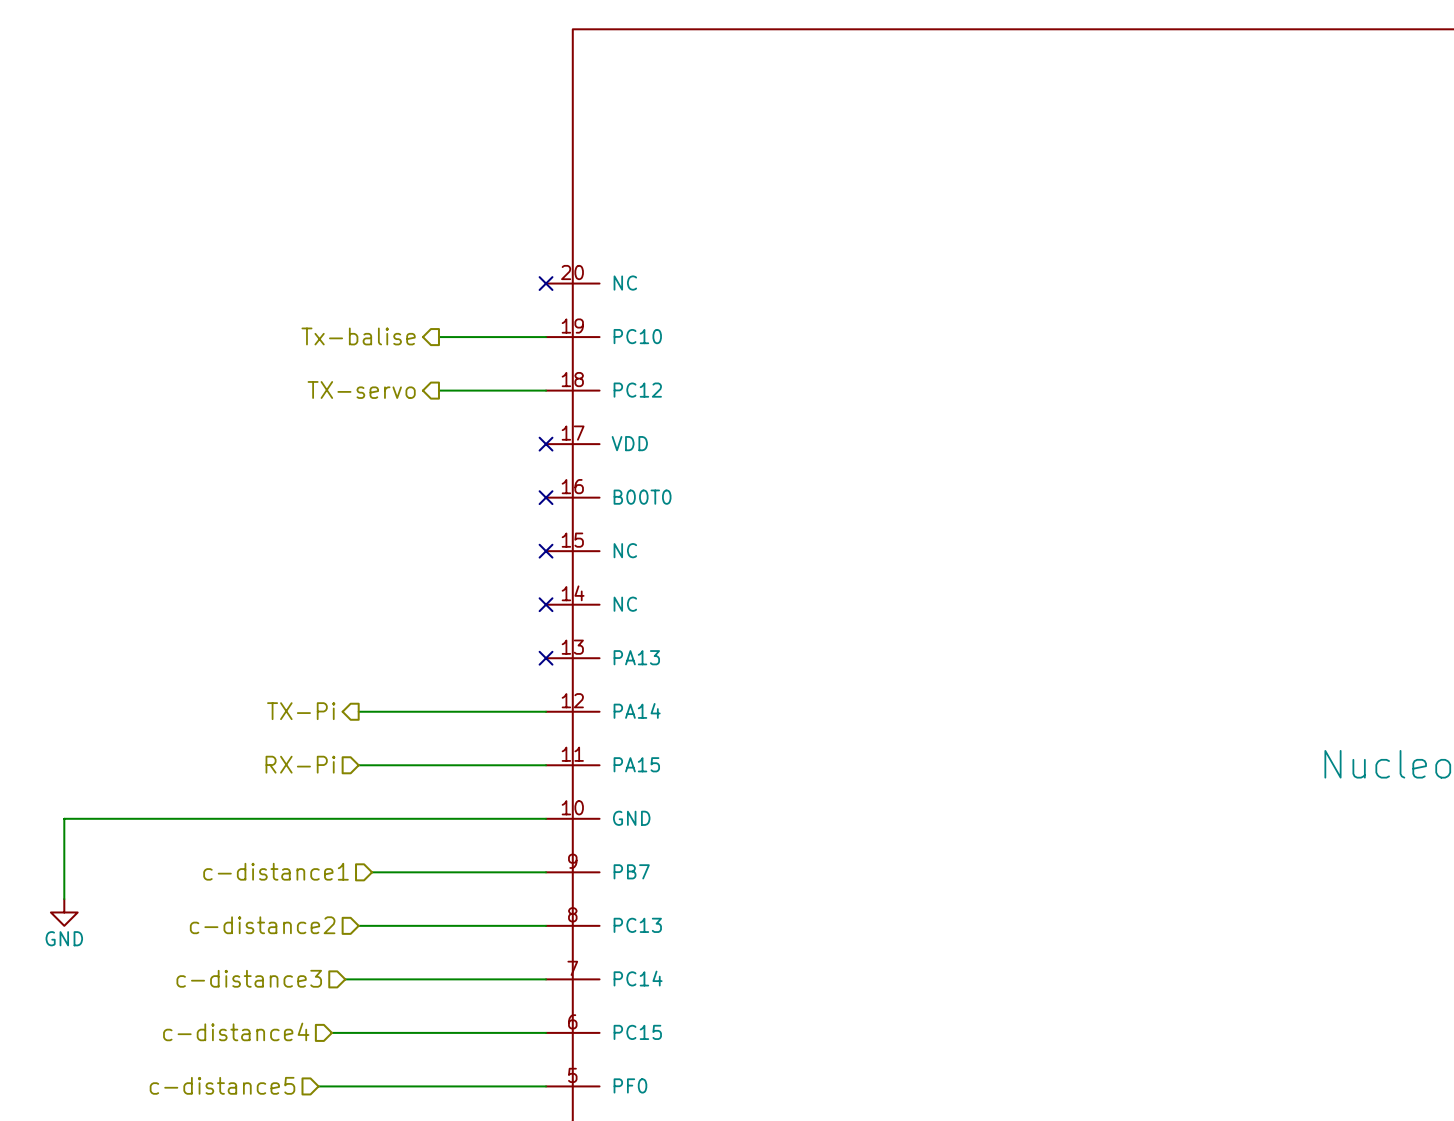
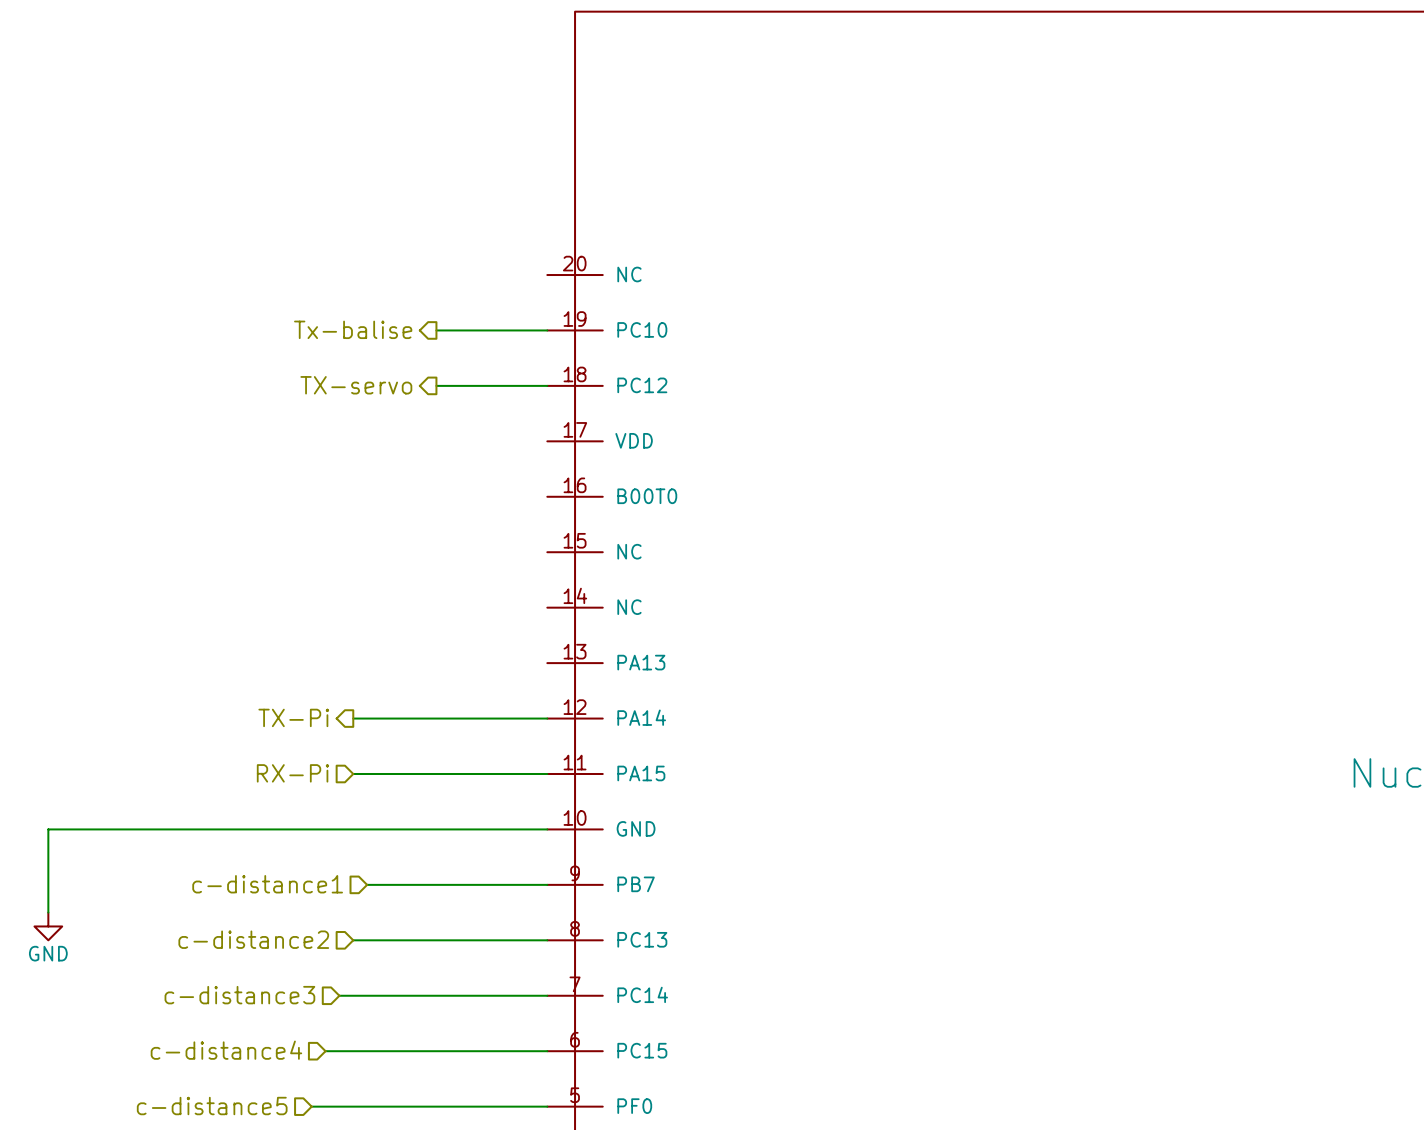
no-connect mark: (546, 283) -> none
no-connect mark: (546, 444) -> none
no-connect mark: (546, 497) -> none
no-connect mark: (546, 551) -> none
no-connect mark: (546, 604) -> none
no-connect mark: (546, 658) -> none

